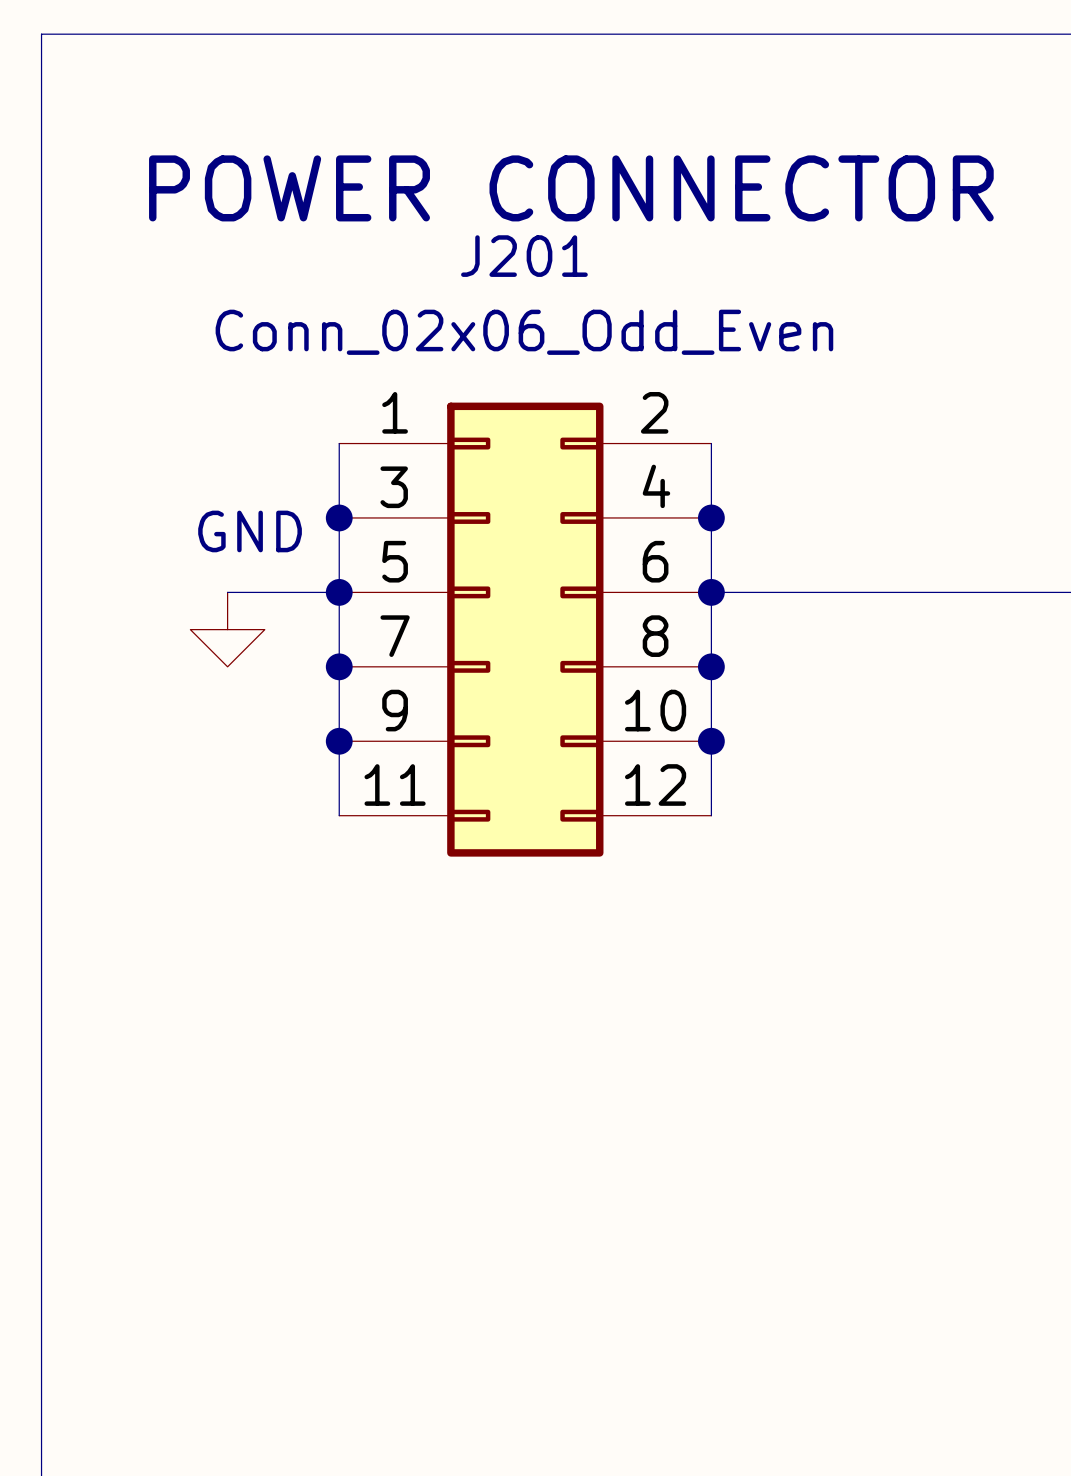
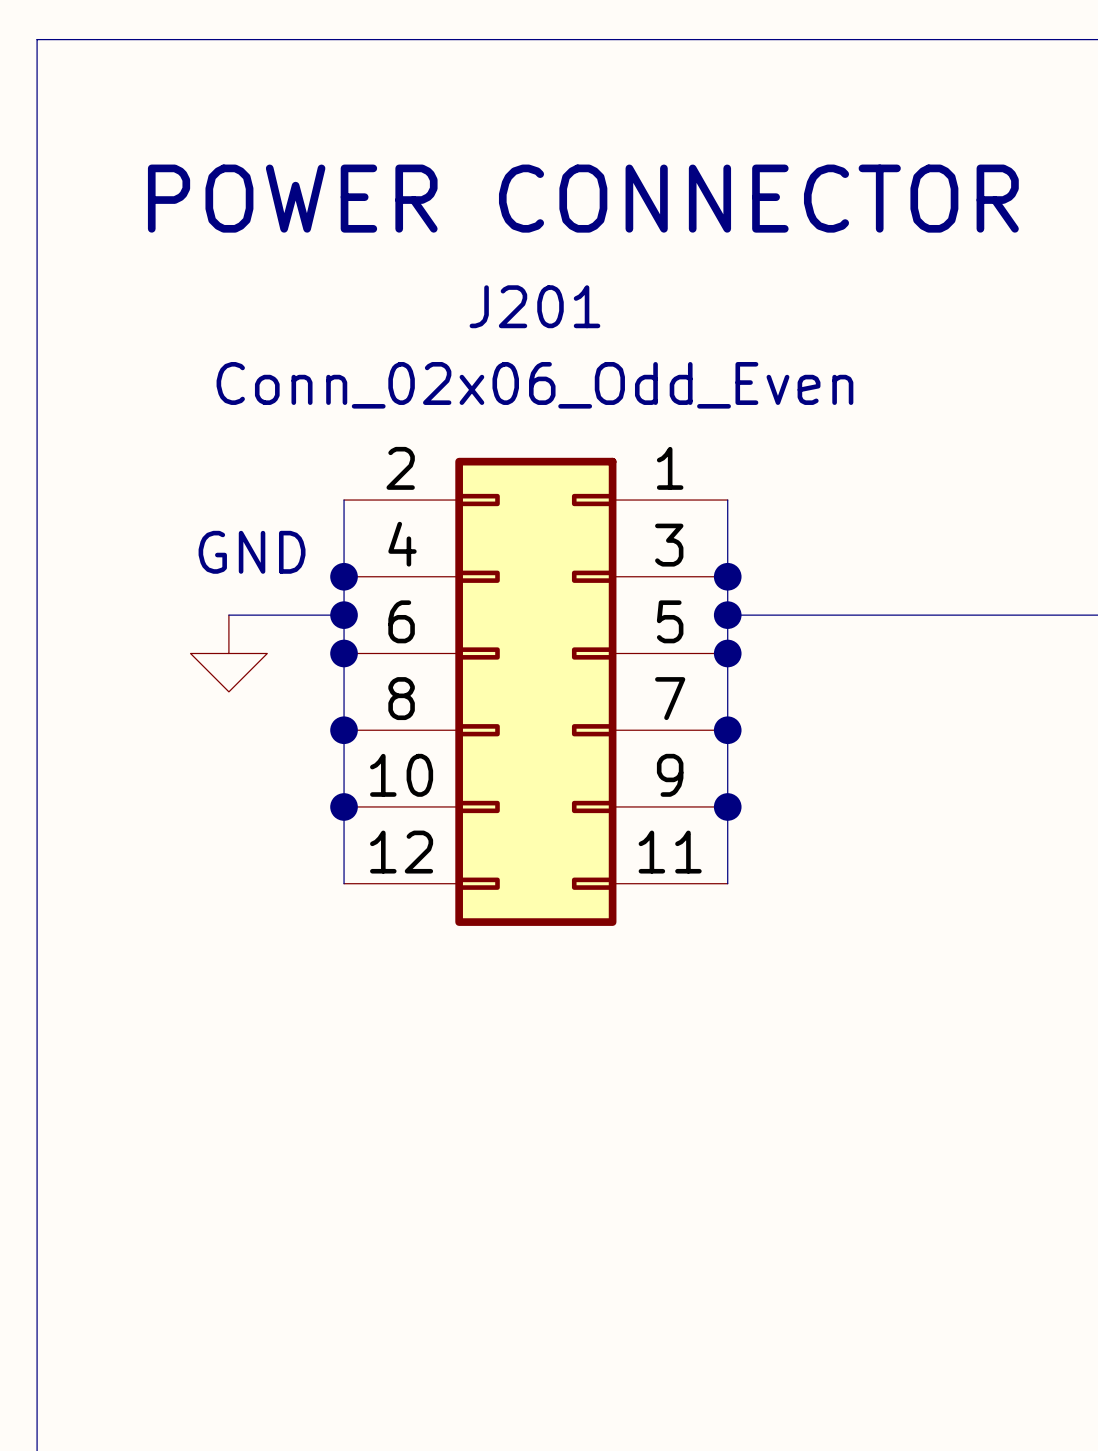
wire: (339, 443) (339, 480) -> (344, 845) (344, 883)
wire: (711, 443) (711, 480) -> (727, 845) (727, 883)
junction position: (339, 517) -> (344, 576)
junction position: (711, 517) -> (727, 576)
junction: none -> (344, 653)
J201 flip: as is (525, 629) -> left-right (535, 691)
junction: none -> (727, 653)
junction: (339, 666) -> none
junction: (711, 666) -> none
junction: none -> (344, 730)
junction: none -> (727, 730)
junction: (339, 741) -> none
junction: (711, 741) -> none
junction: none -> (344, 806)
junction: none -> (727, 806)

